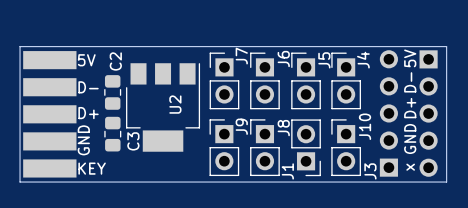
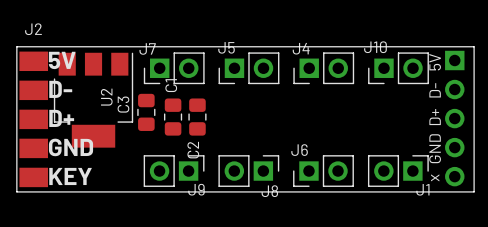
C2 name position: C2 (115, 61) -> C2 (193, 150)
J7 rotation: 0° (224, 80) -> 90° counterclockwise (174, 68)
J7 position: (224, 80) -> (174, 68)
J6 rotation: 0° (264, 80) -> 90° counterclockwise (323, 171)
J6 position: (264, 80) -> (323, 171)
J5 rotation: 0° (306, 80) -> 90° counterclockwise (248, 68)
J5 position: (306, 80) -> (248, 68)
J4 rotation: 0° (346, 80) -> 90° counterclockwise (323, 68)
J4 position: (346, 80) -> (323, 68)
C2 position: (112, 92) -> (197, 117)
U2 position: (163, 107) -> (93, 100)
C1: none -> (173, 117)
J3: (388, 113) -> none
J2: none -> (33, 119)
part: (49, 114) -> none
C3 position: (112, 134) -> (146, 112)
C3 name position: C3 (133, 141) -> C3 (123, 104)
J9 rotation: 0° (224, 147) -> 90° clockwise (174, 171)
J9 position: (224, 147) -> (174, 171)
J8 rotation: 0° (264, 147) -> 90° clockwise (248, 171)
J1 rotation: 0° (306, 147) -> 90° counterclockwise (398, 171)
J1 position: (306, 147) -> (398, 171)
J10 rotation: 0° (346, 147) -> 90° counterclockwise (398, 68)
J10 position: (346, 147) -> (398, 68)

